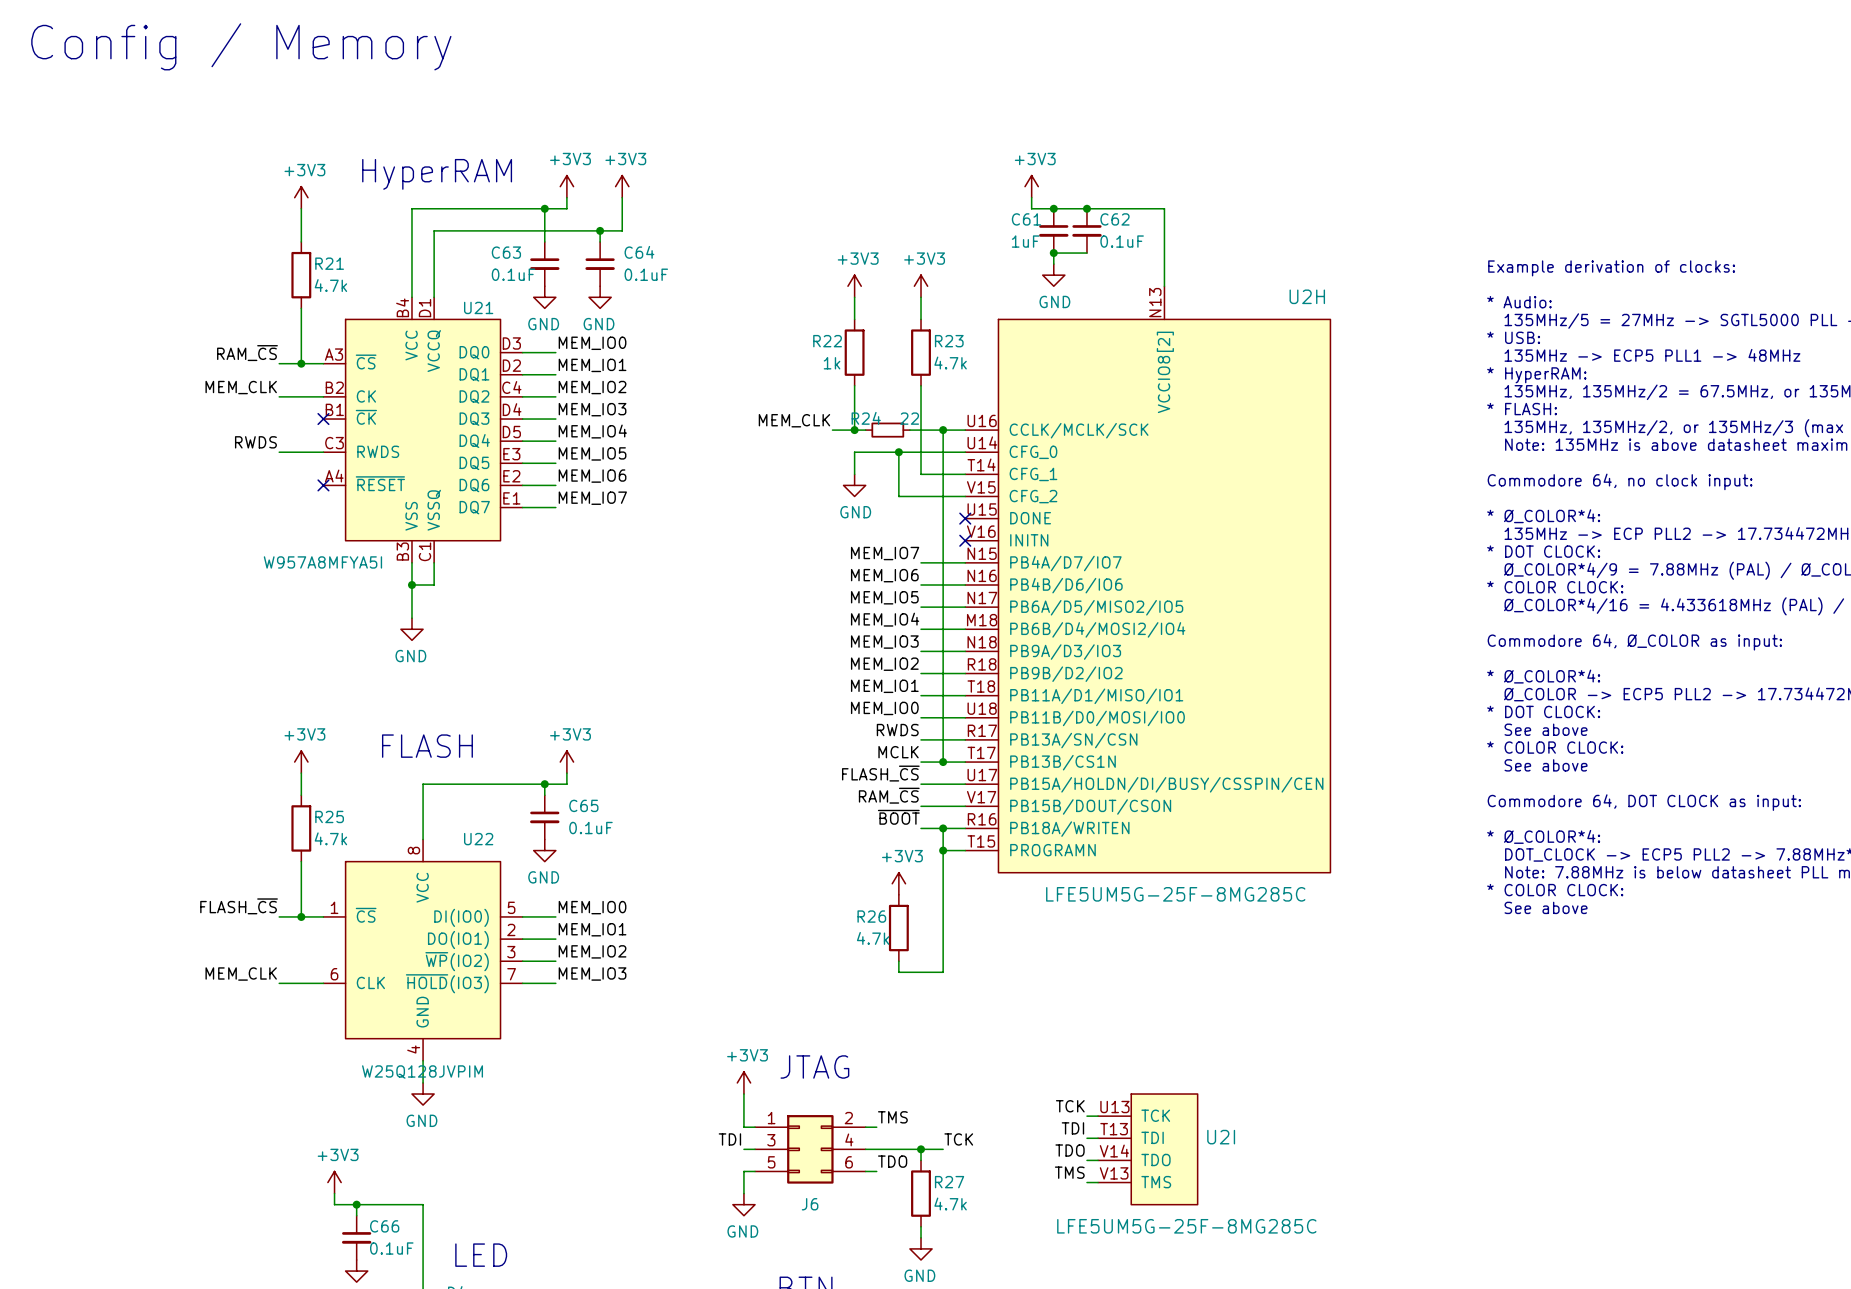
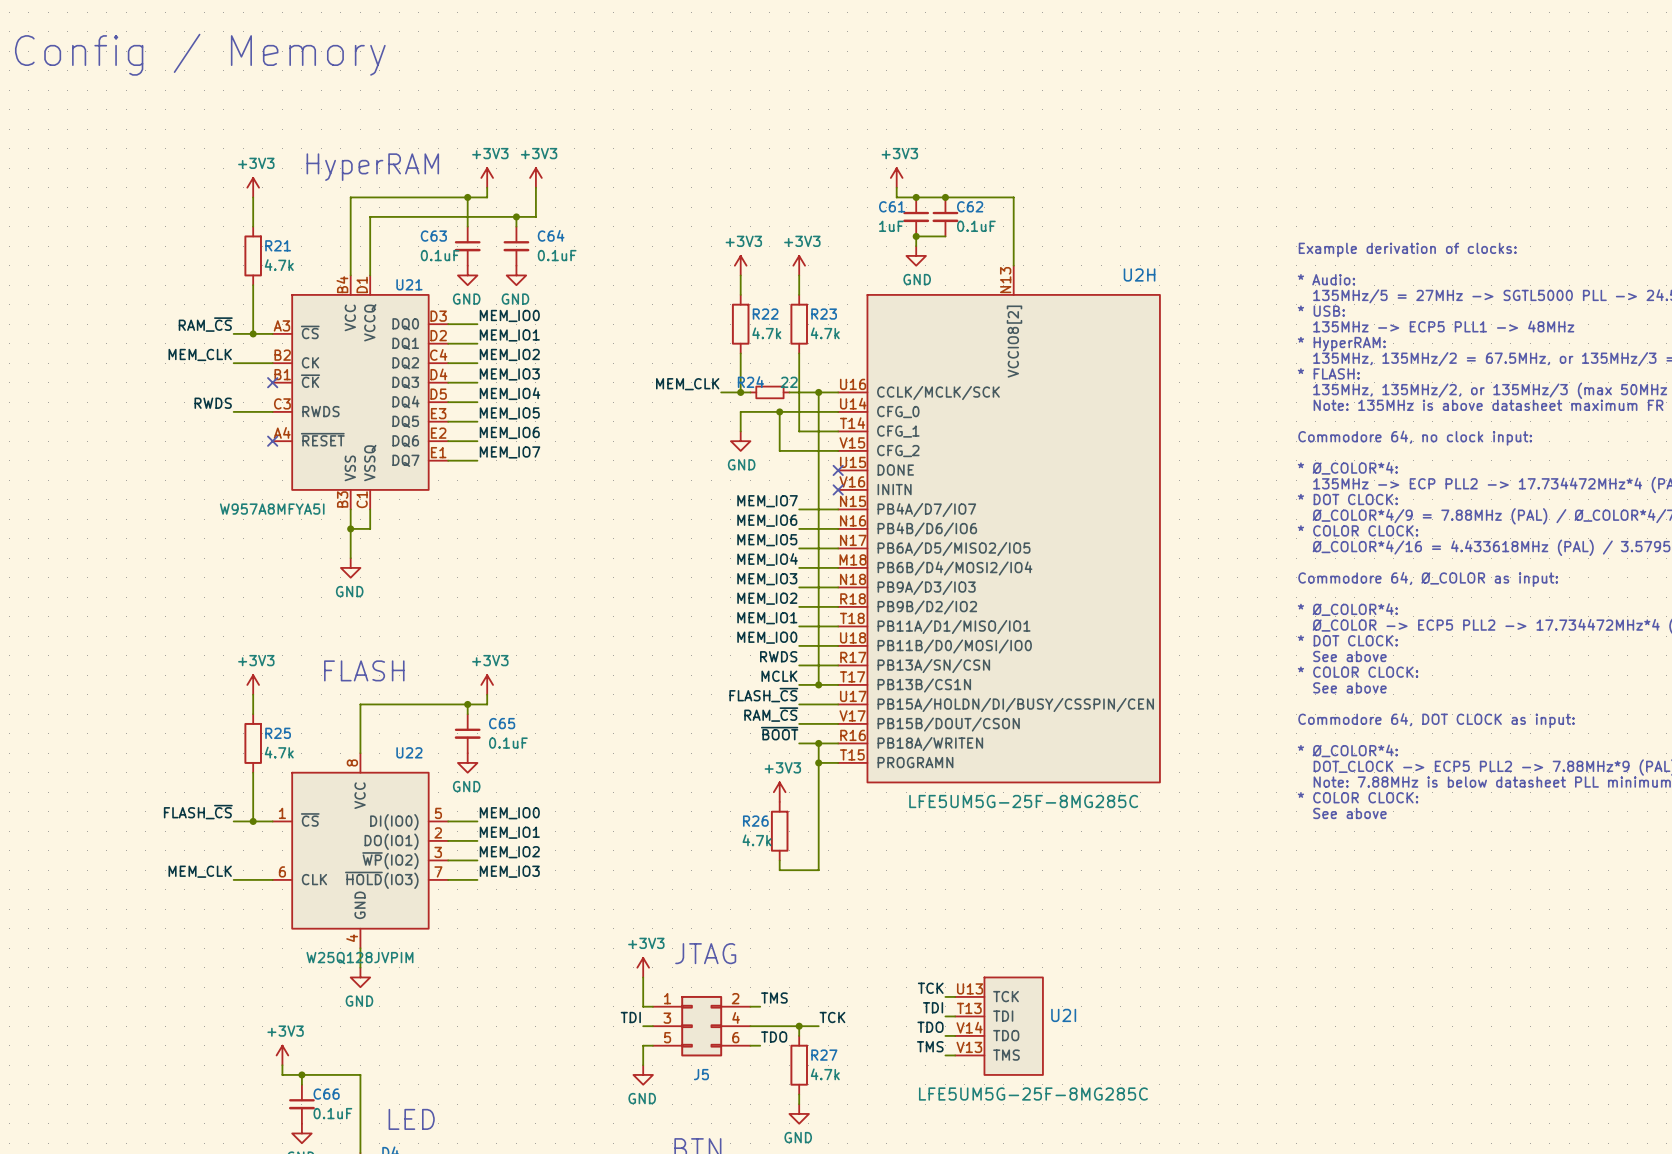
R22 name position: R22 (827, 341) -> R22 (765, 314)
R22 value: 1k (832, 363) -> 4.7k (766, 333)
J6 name: J6 (810, 1204) -> J5 (701, 1074)

